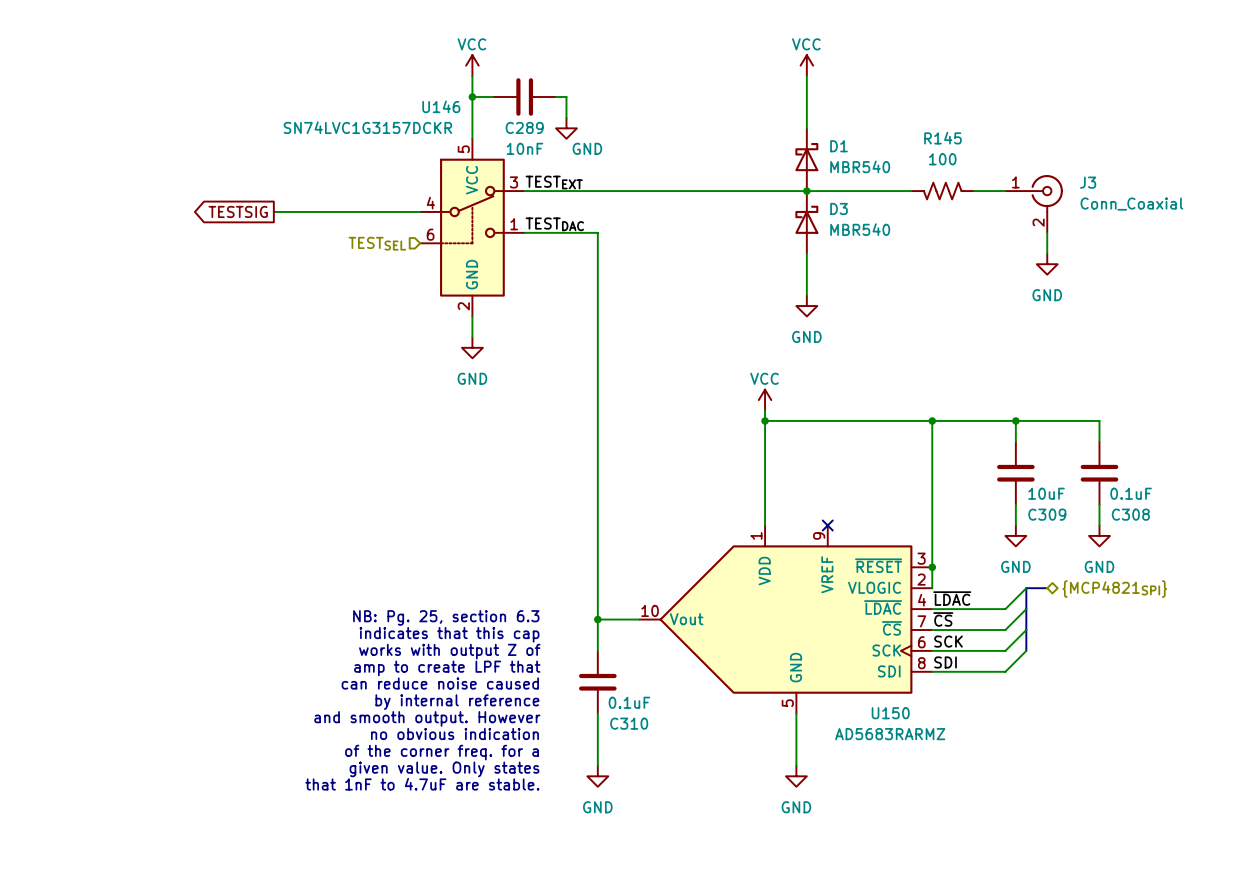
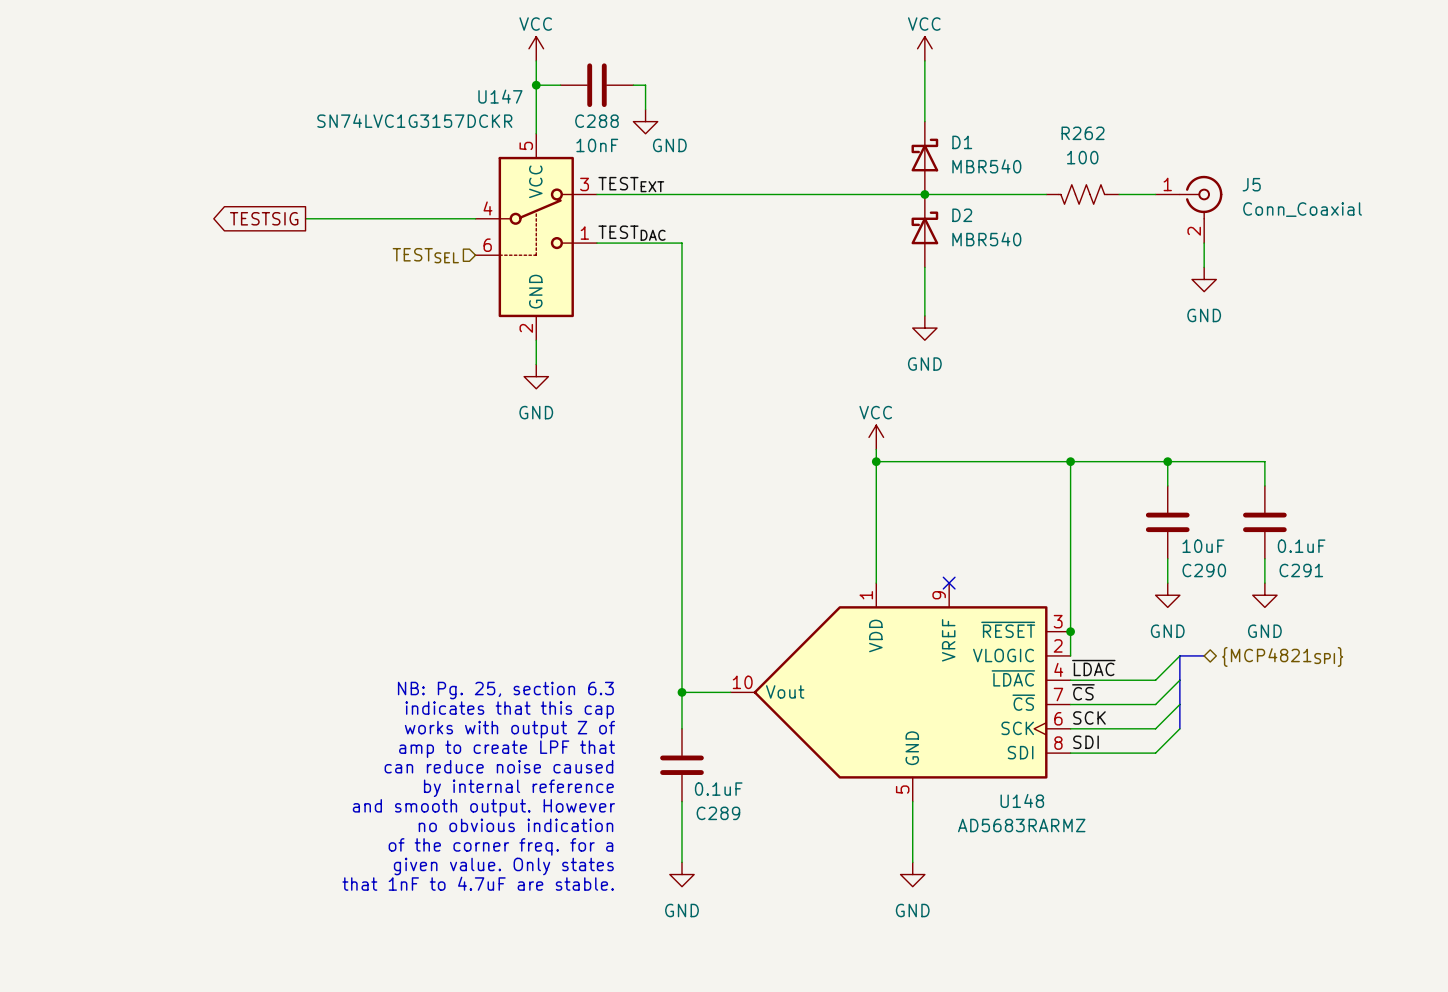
U146 name: U146 (441, 106) -> U147 (500, 96)
C289 name: C289 (524, 127) -> C288 (596, 121)
R145 name: R145 (942, 138) -> R262 (1083, 133)
J3 name: J3 (1088, 182) -> J5 (1251, 184)
D3 name: D3 (839, 208) -> D2 (962, 215)
C309 name: C309 (1047, 514) -> C290 (1204, 570)
C308 name: C308 (1130, 514) -> C291 (1301, 570)
U150 name: U150 (890, 713) -> U148 (1022, 800)
C310 name: C310 (629, 723) -> C289 (718, 813)

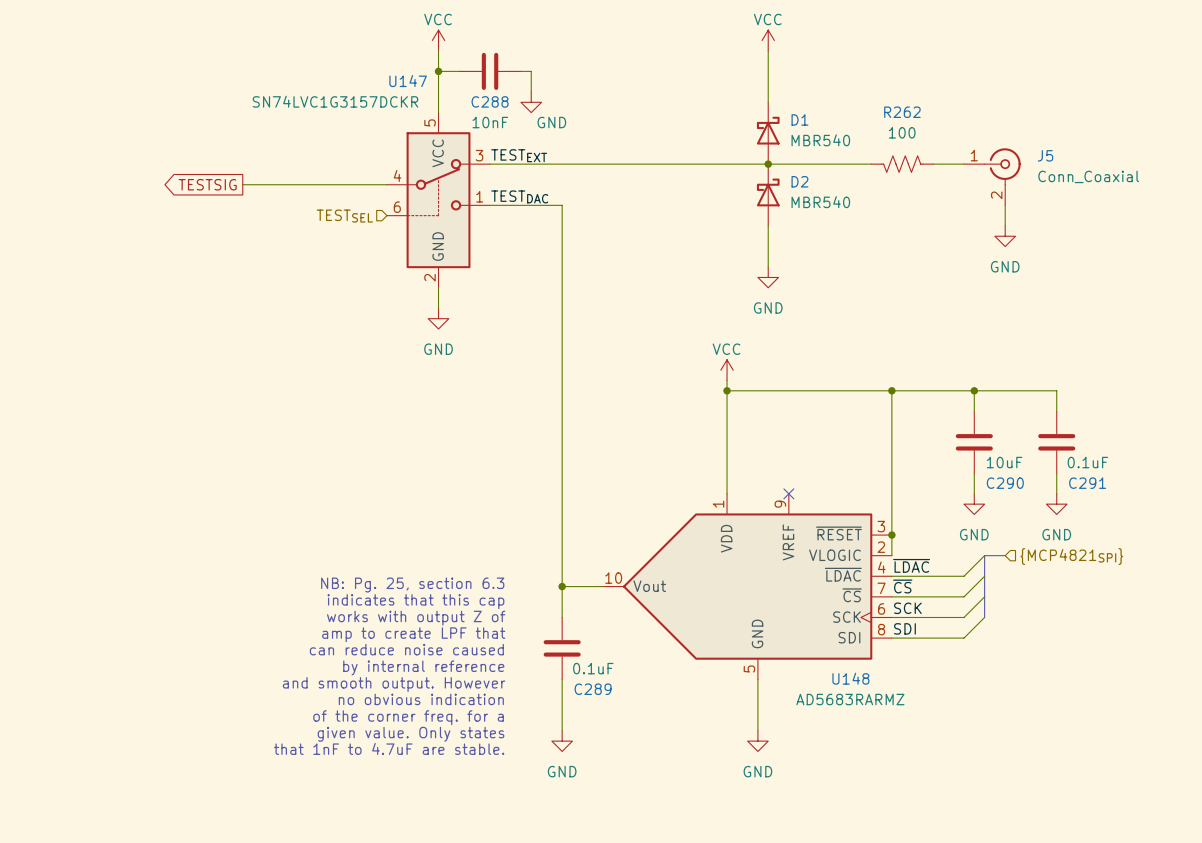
hierarchical label shape: bidirectional (1282, 656) -> input (1071, 556)

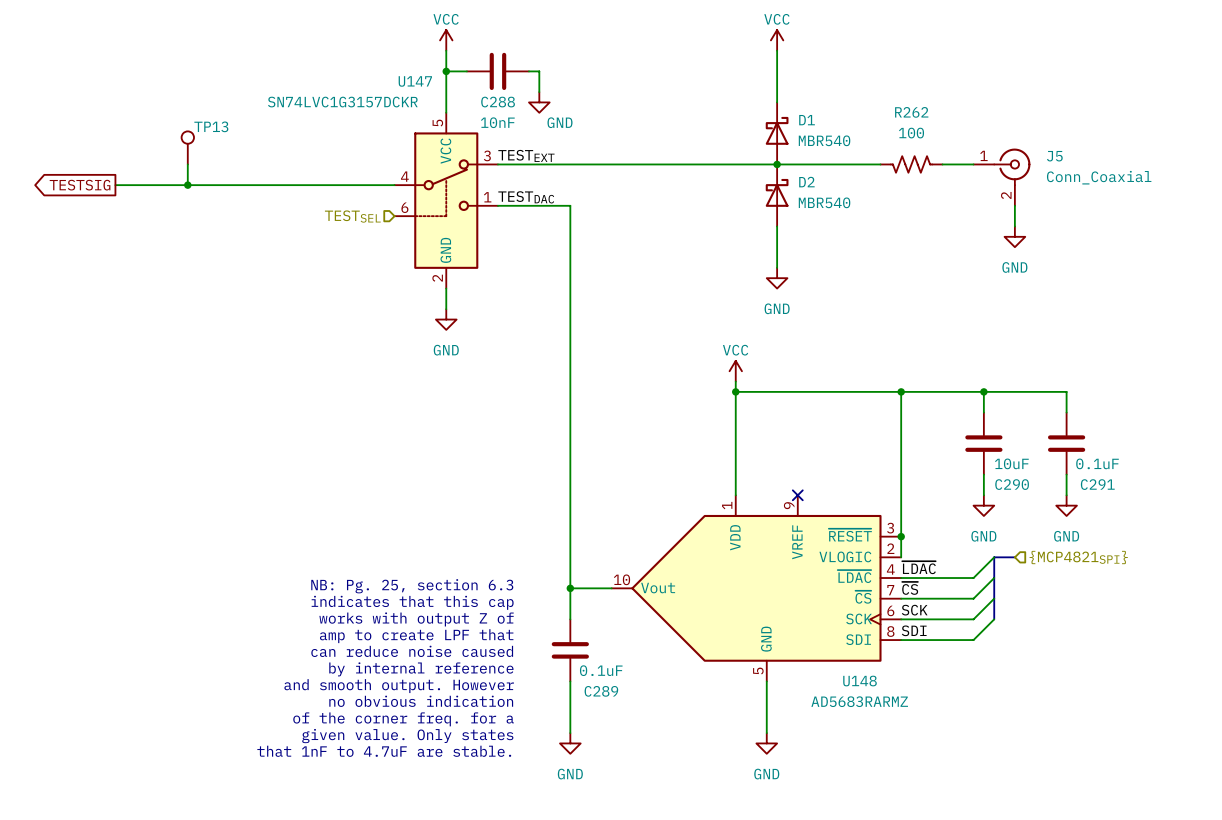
TP13: none -> (187, 147)
wire: none -> (187, 164) (187, 185)
wire: none -> (115, 185) (249, 185)
junction: none -> (187, 185)
global label position: TESTSIG (207, 184) -> TESTSIG (80, 185)

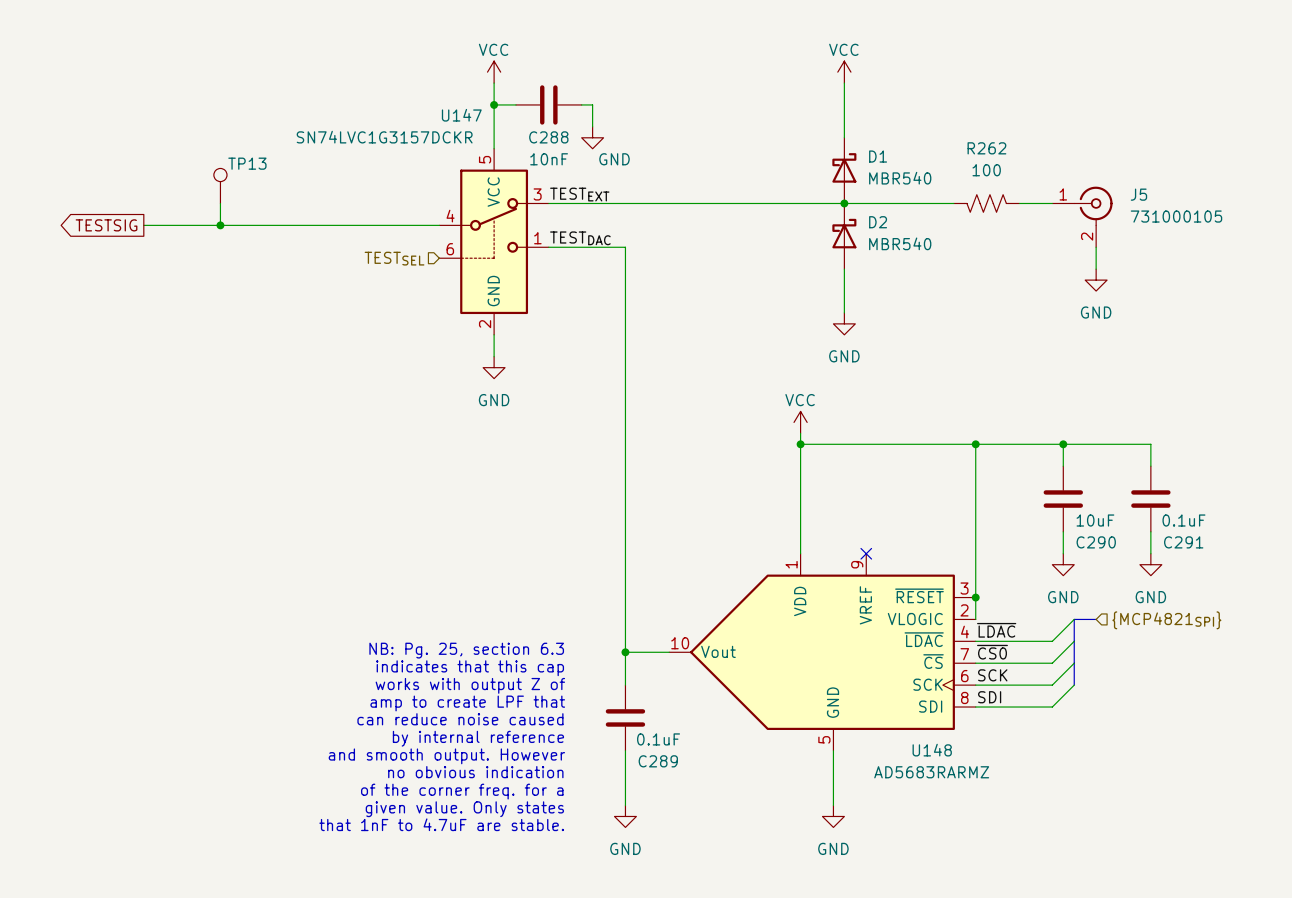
J5 value: Conn_Coaxial (1099, 177) -> 731000105 (1176, 216)
label: ~{CS} (910, 588) -> ~{CS0} (992, 652)

